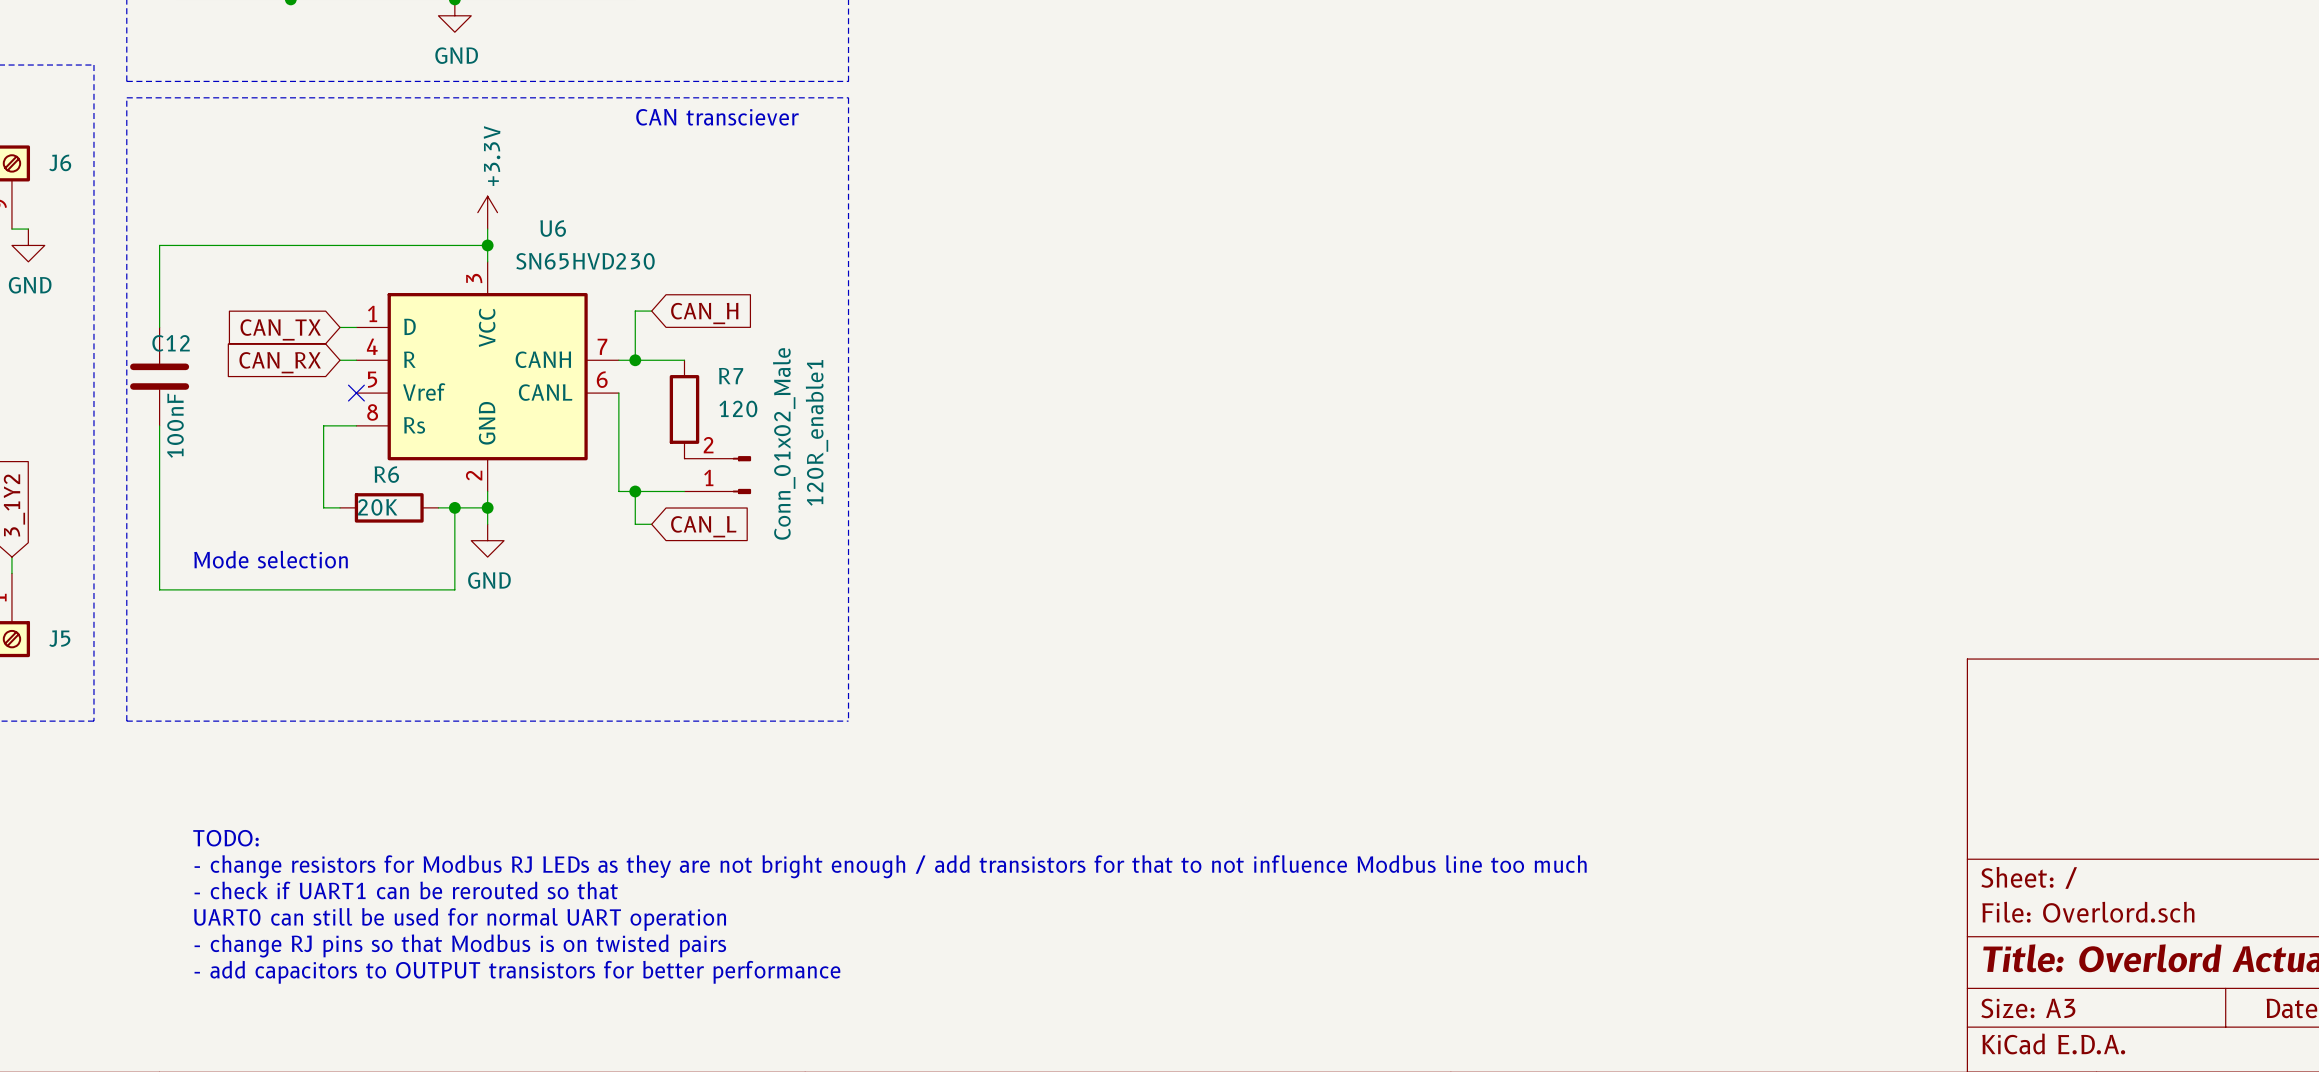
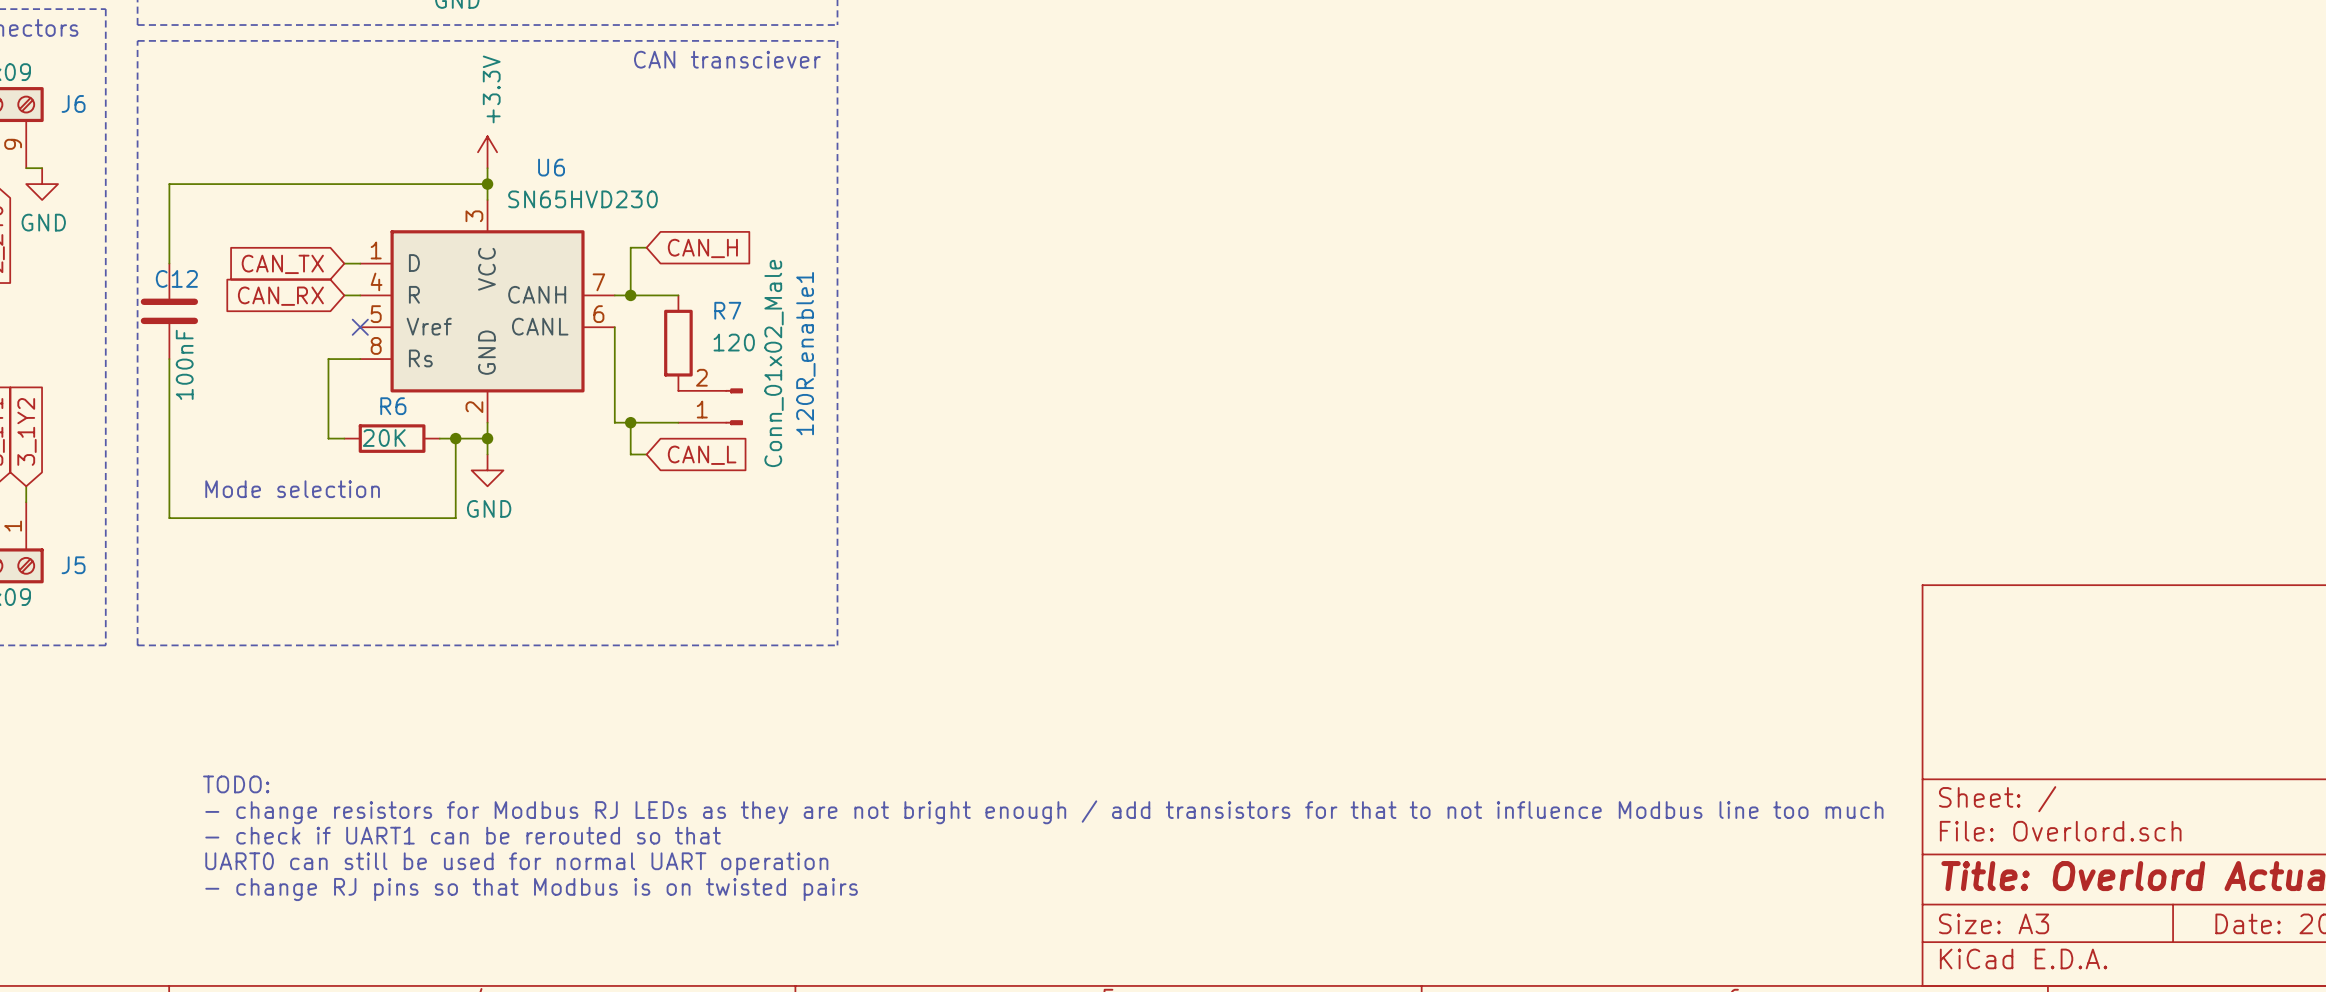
text: TODO: (226, 838) -> none
text: - change resistors for Modbus RJ LEDs as they are not bright enough / add transistors for that to not influence Modbus line too much (890, 866) -> TODO: (236, 784)
text: - check if UART1 can be rerouted so that (406, 890) -> - change resistors for Modbus RJ LEDs as they are not bright enough / add transistors for that to not influence Modbus line too much (1044, 812)
text: UART0 can still be used for normal UART operation (460, 919) -> - check if UART1 can be rerouted so that (463, 835)
text: - change RJ pins so that Modbus is on twisted pairs (460, 945) -> UART0 can still be used for normal UART operation (516, 863)
text: - add capacitors to OUTPUT transistors for better performance (517, 972) -> - change RJ pins so that Modbus is on twisted pairs (531, 889)

